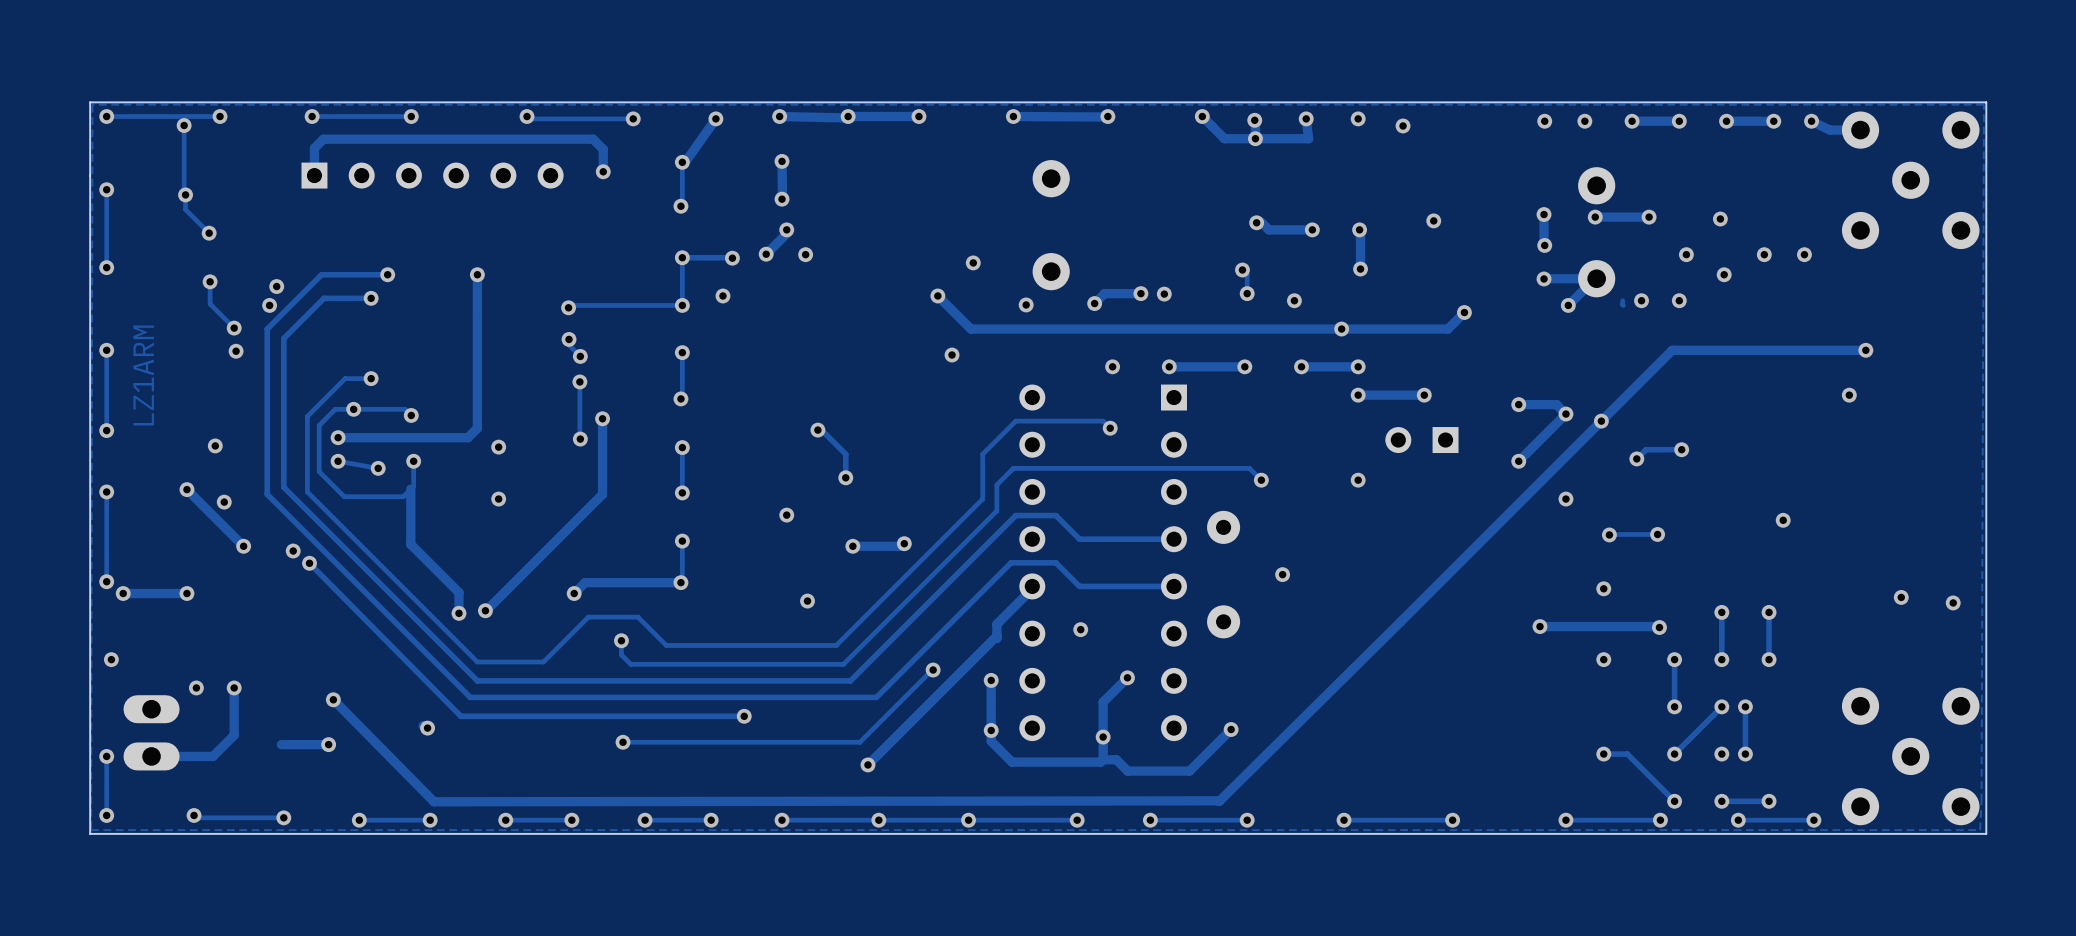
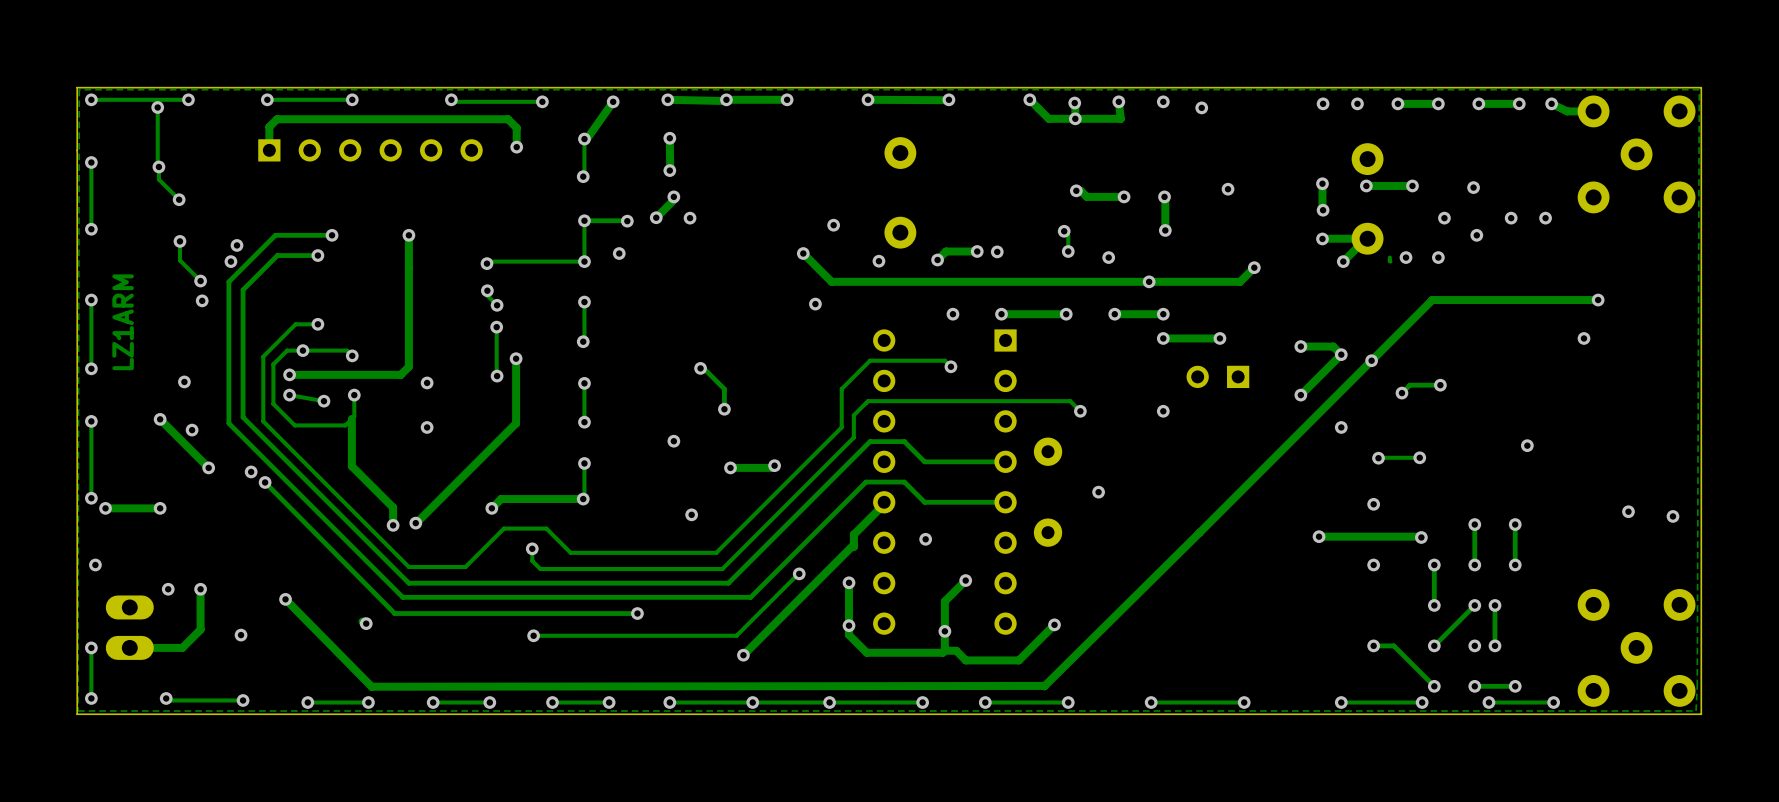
track: (328, 744) (281, 744) -> none
via position: (328, 744) -> (241, 635)

